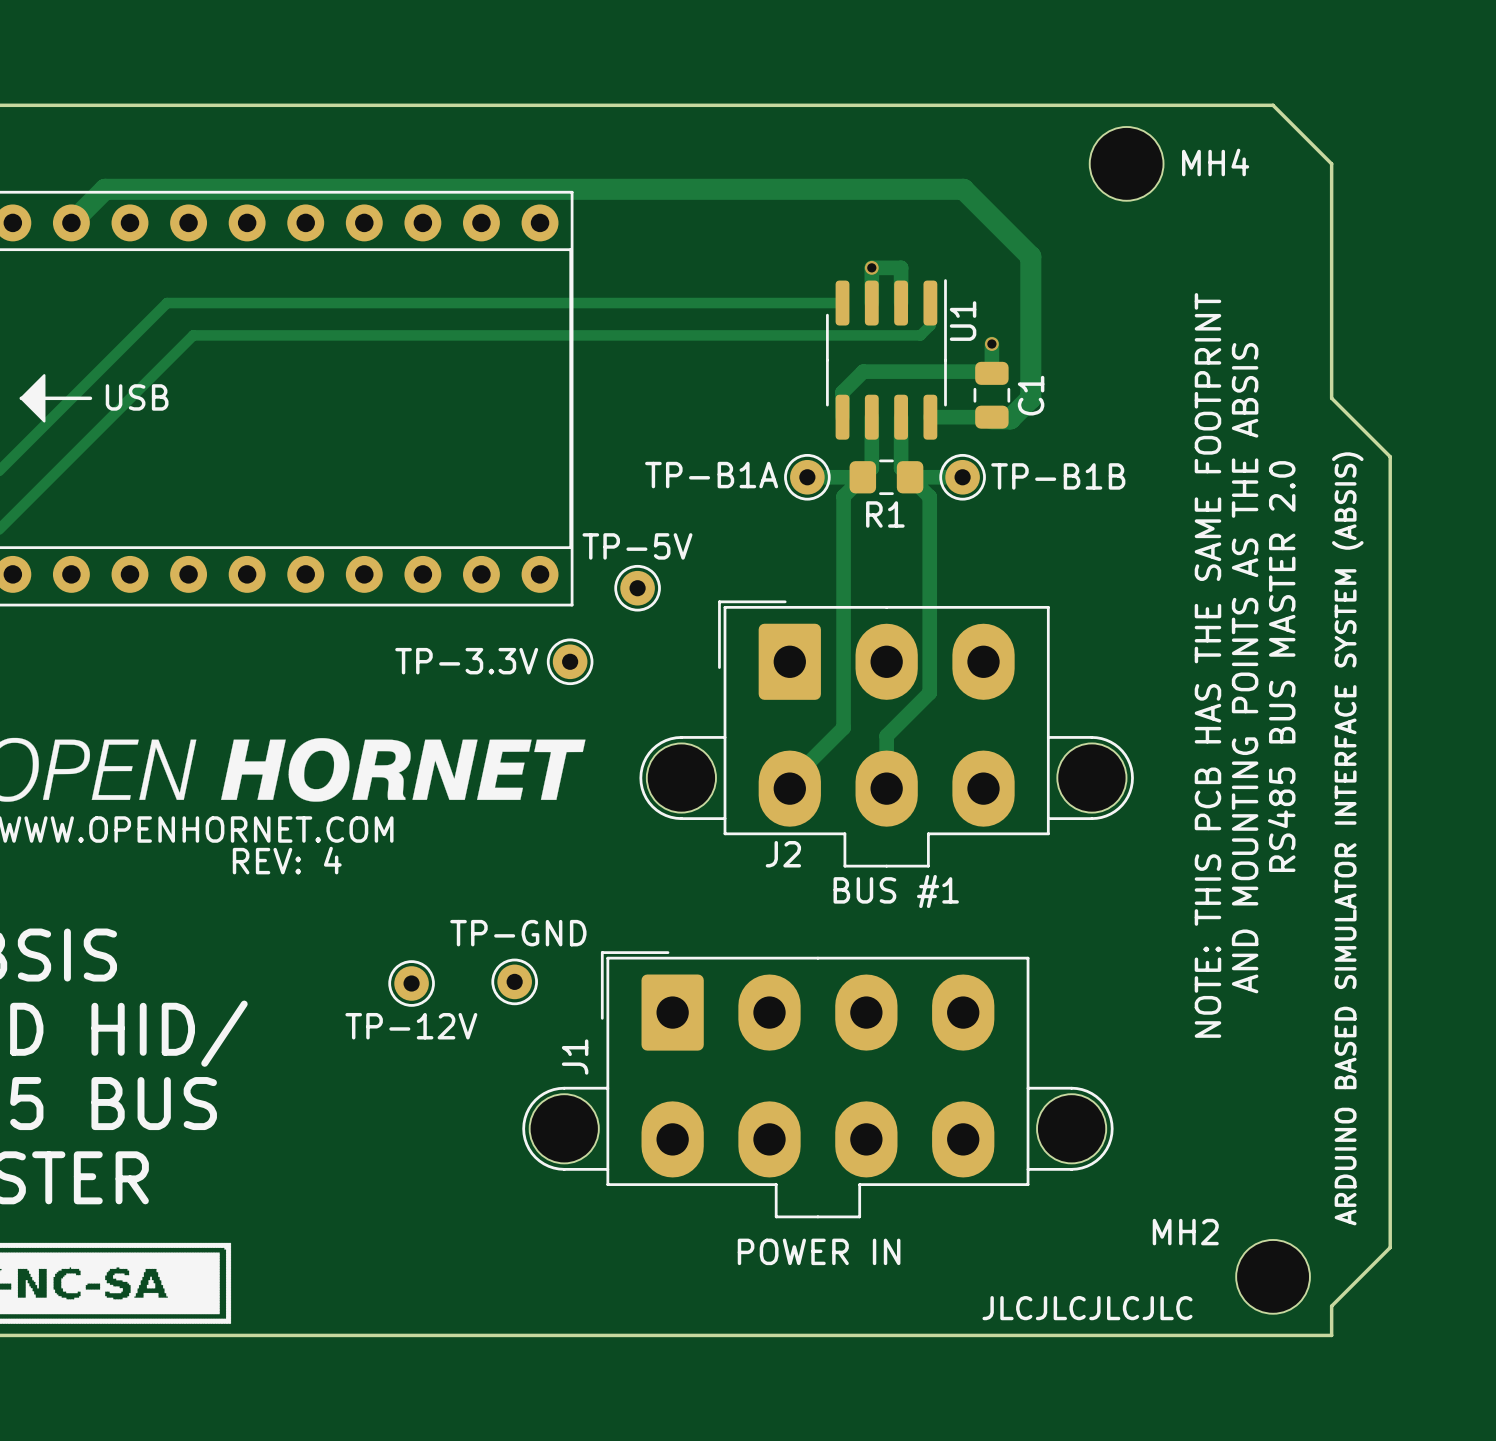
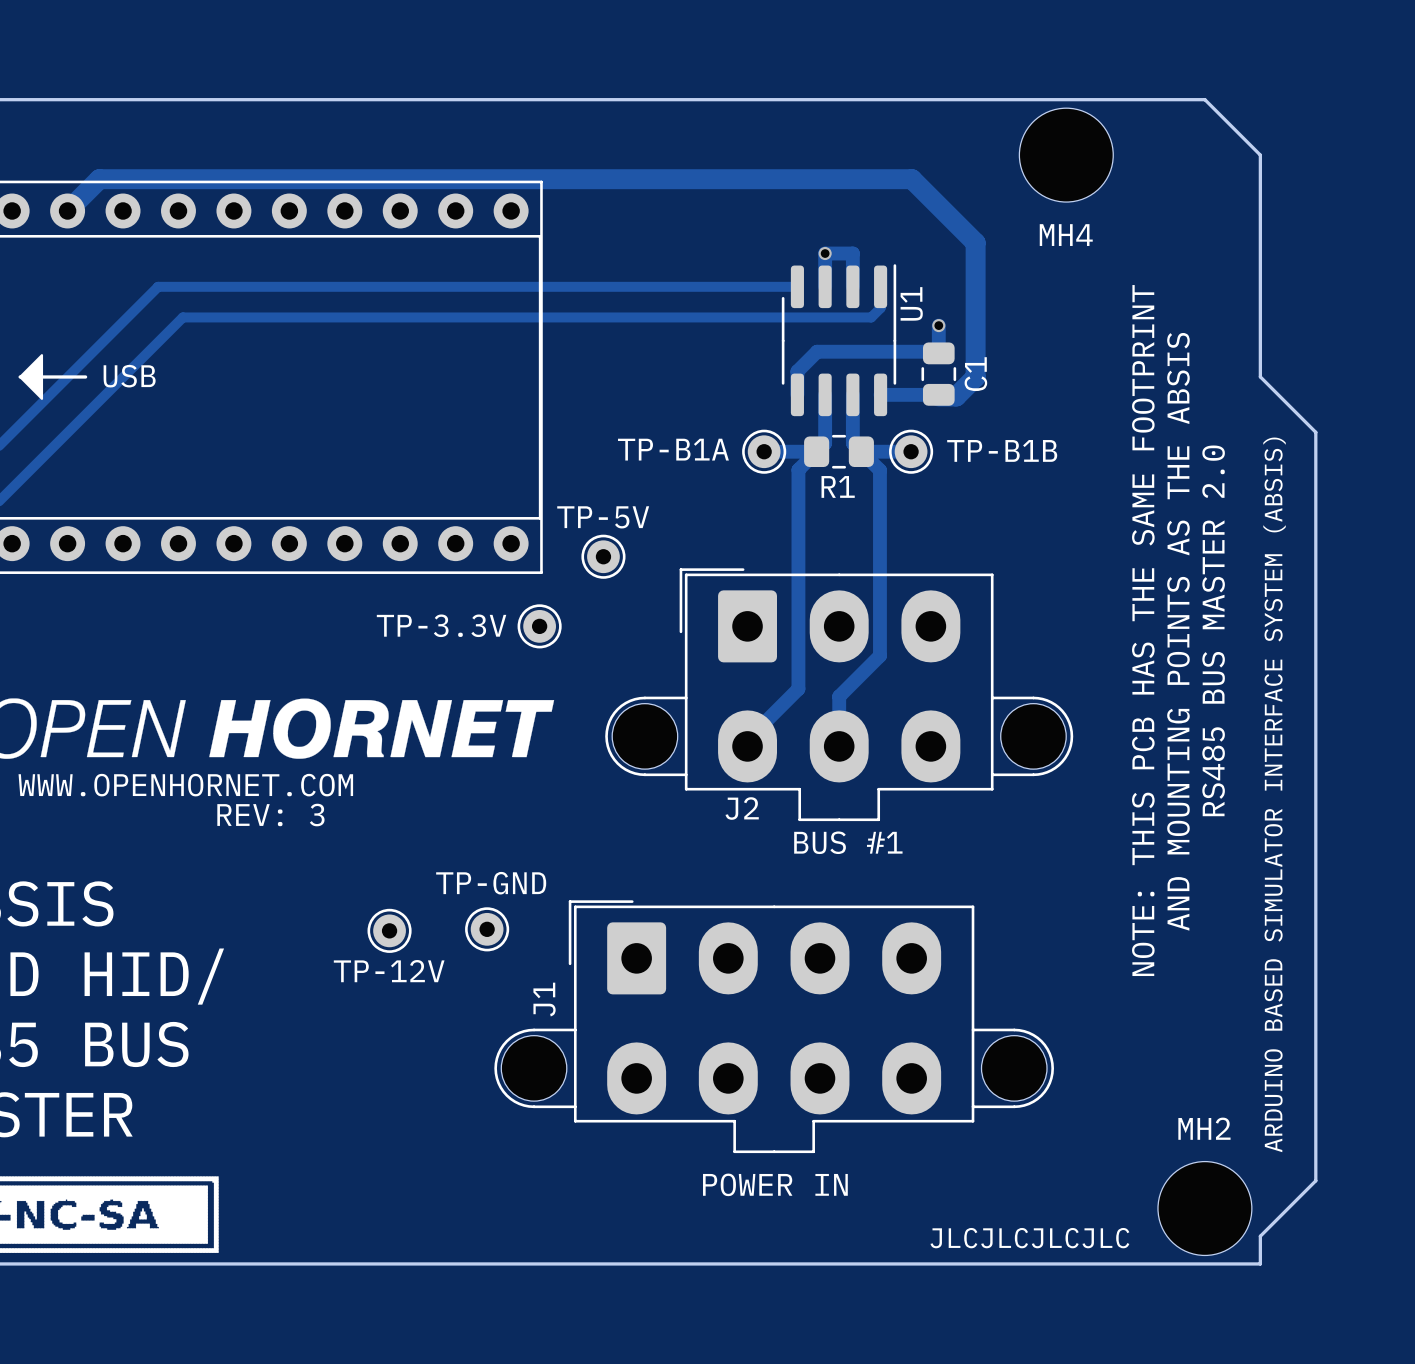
MH4 footprint: [1089, 126, 1164, 201] -> [1019, 108, 1114, 203]
MH4 name position: MH4 (1215, 162) -> MH4 (1066, 235)
text: REV: 4 (287, 860) -> REV: 3 (270, 815)
MH2 name position: MH2 (1185, 1232) -> MH2 (1204, 1128)
MH2 footprint: [1236, 1239, 1310, 1314] -> [1157, 1161, 1252, 1256]

